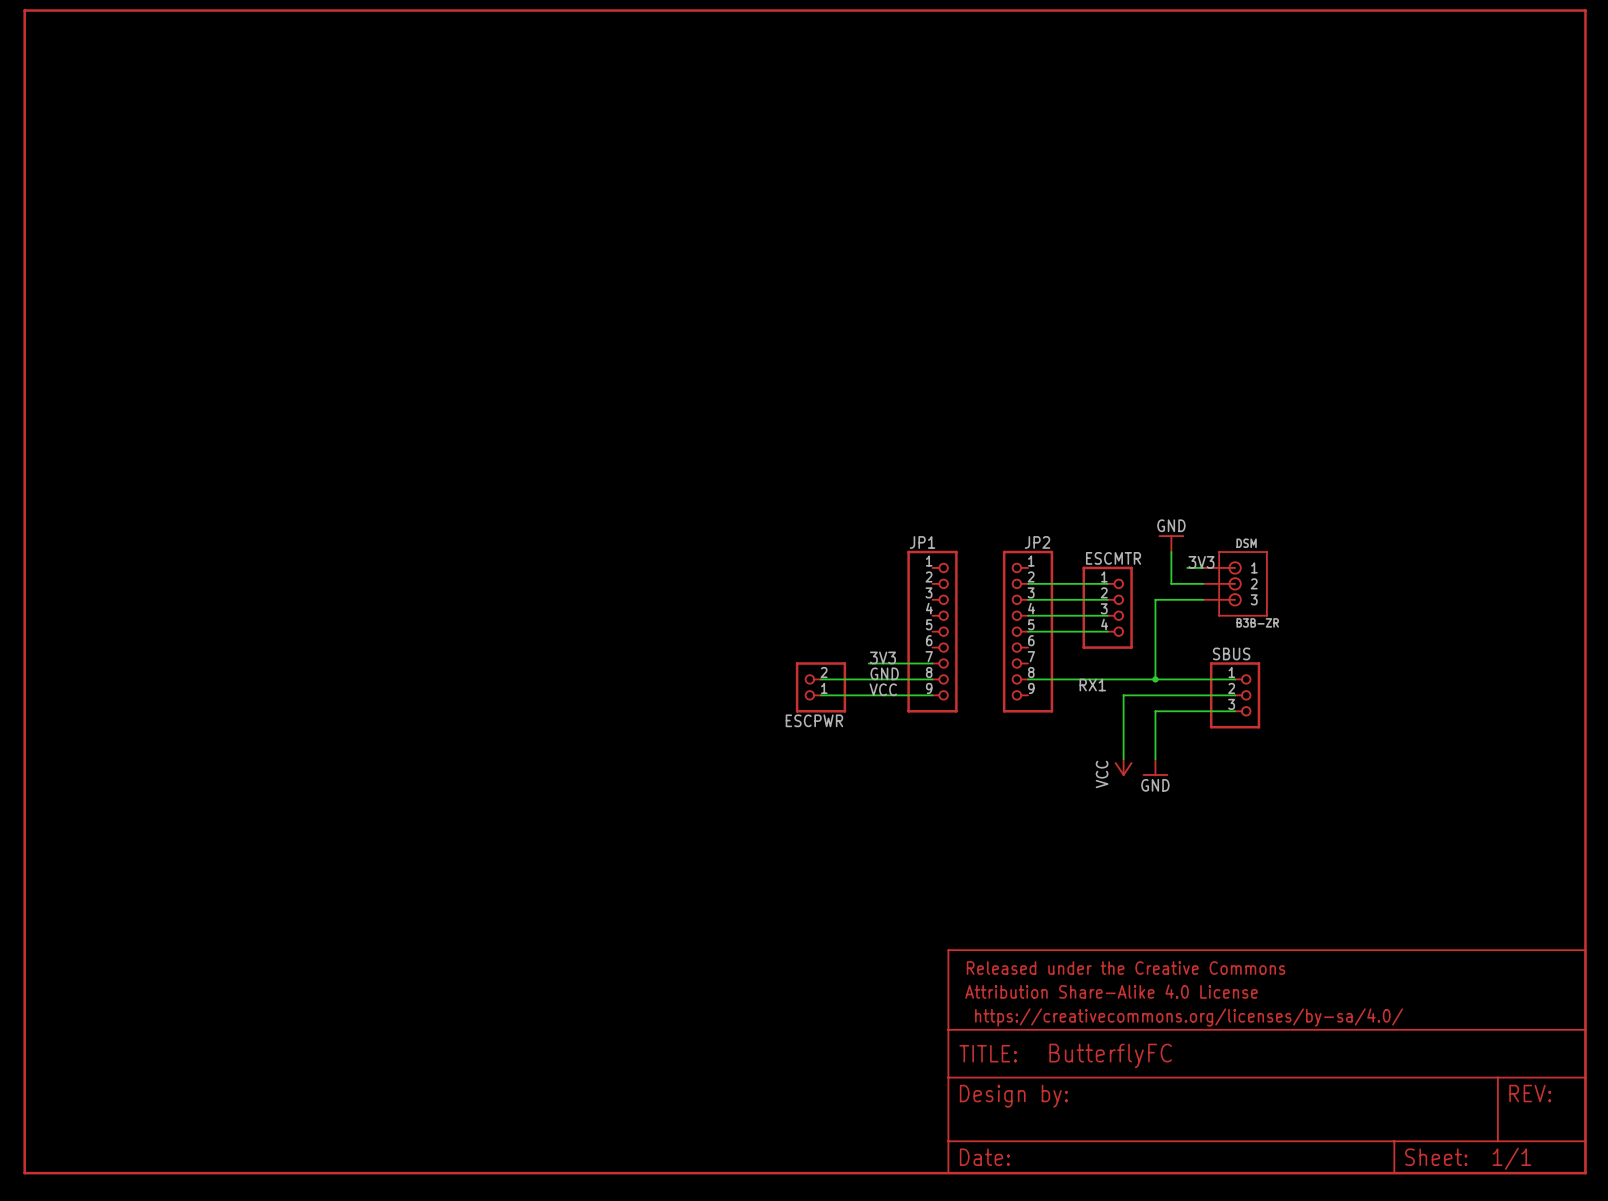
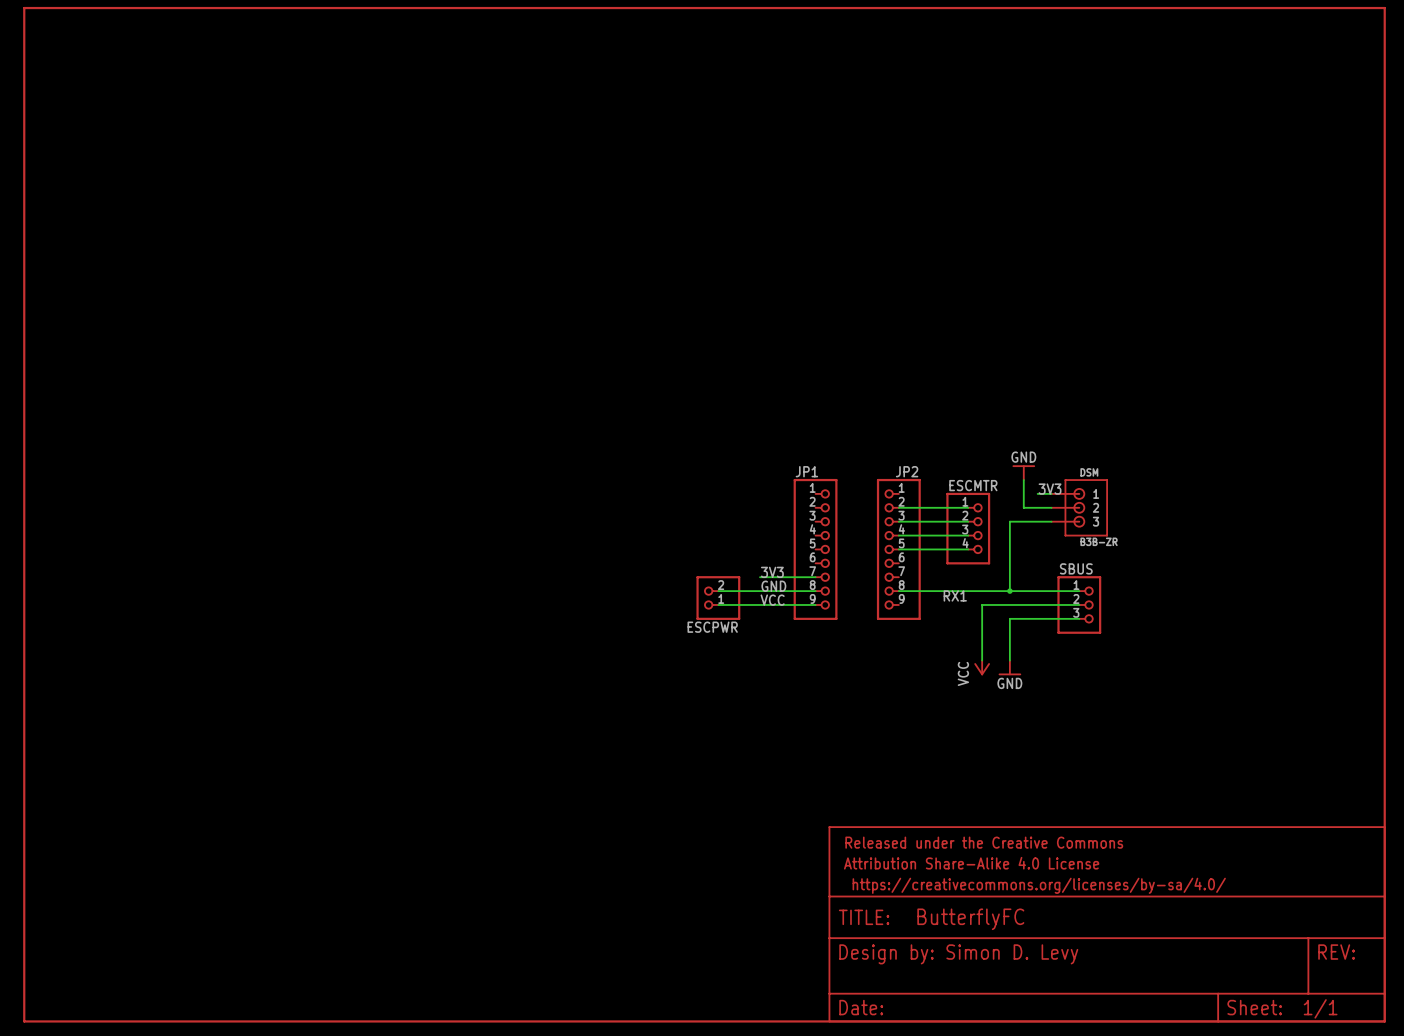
part text: Design by: (1013, 1096) -> Design by: Simon D. Levy (958, 954)

